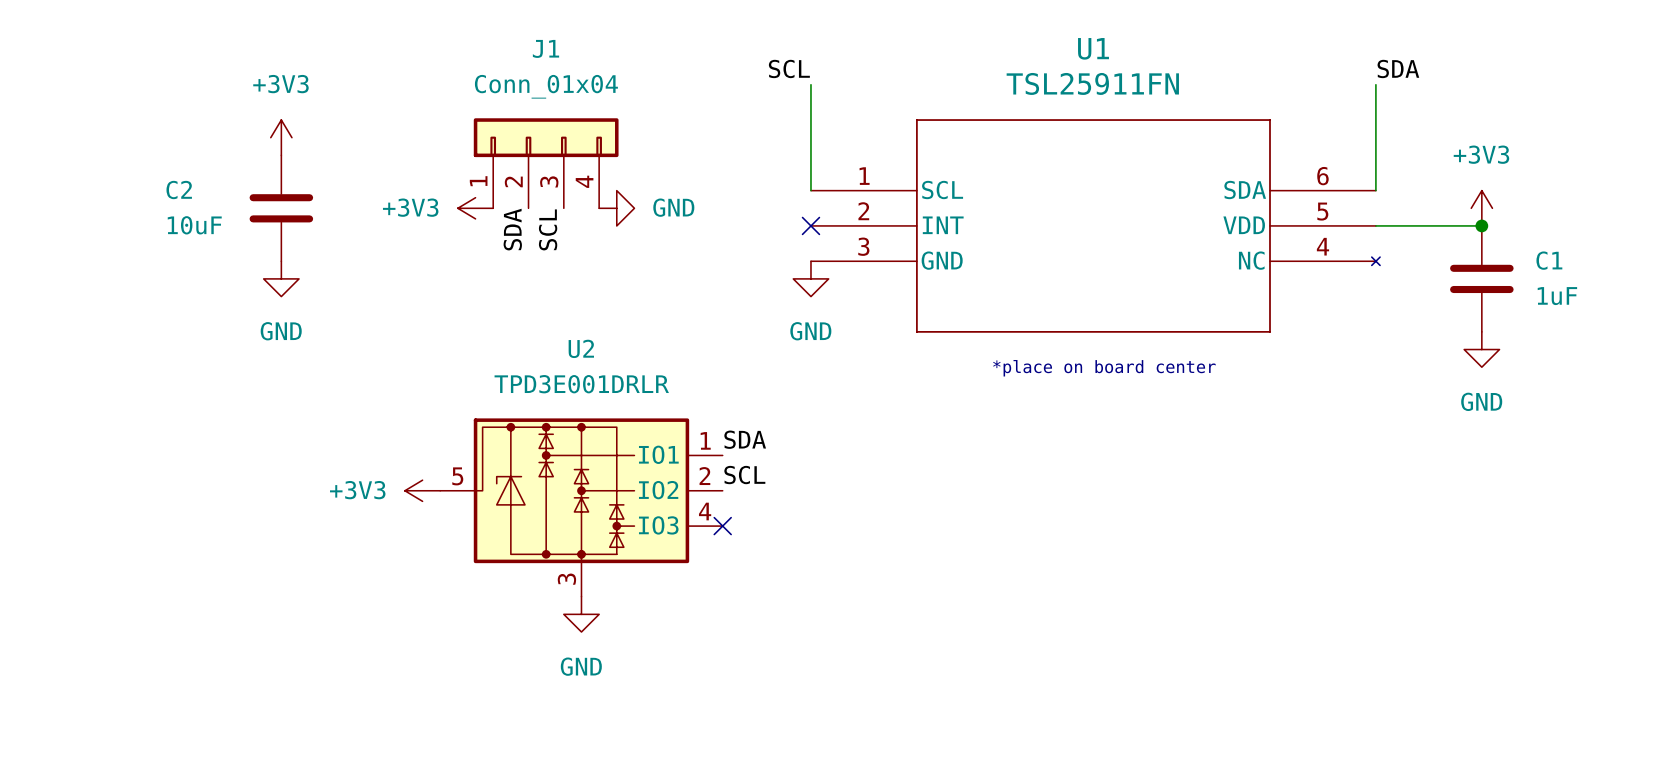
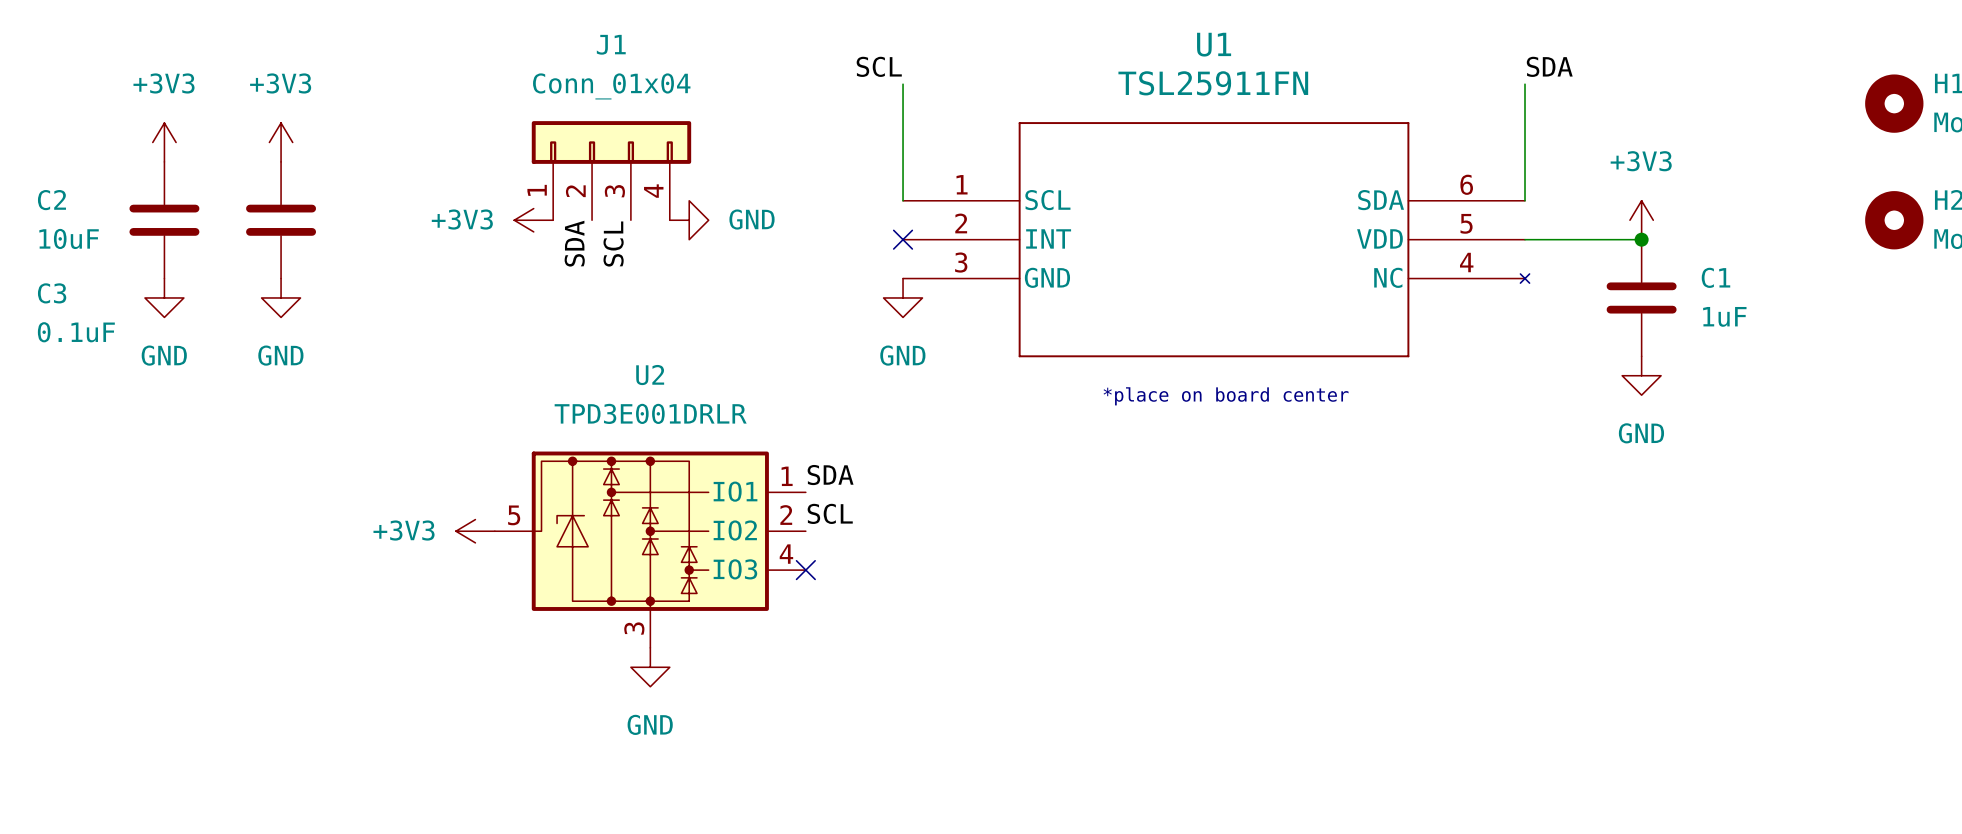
power symbol: none -> +3V3 (164, 142)
power symbol position: +3V3 (281, 137) -> +3V3 (281, 142)
C3: none -> 0.1uF (281, 220)
C2 position: (281, 208) -> (164, 220)
power symbol: none -> GND (164, 297)
power symbol position: GND (281, 278) -> GND (281, 297)

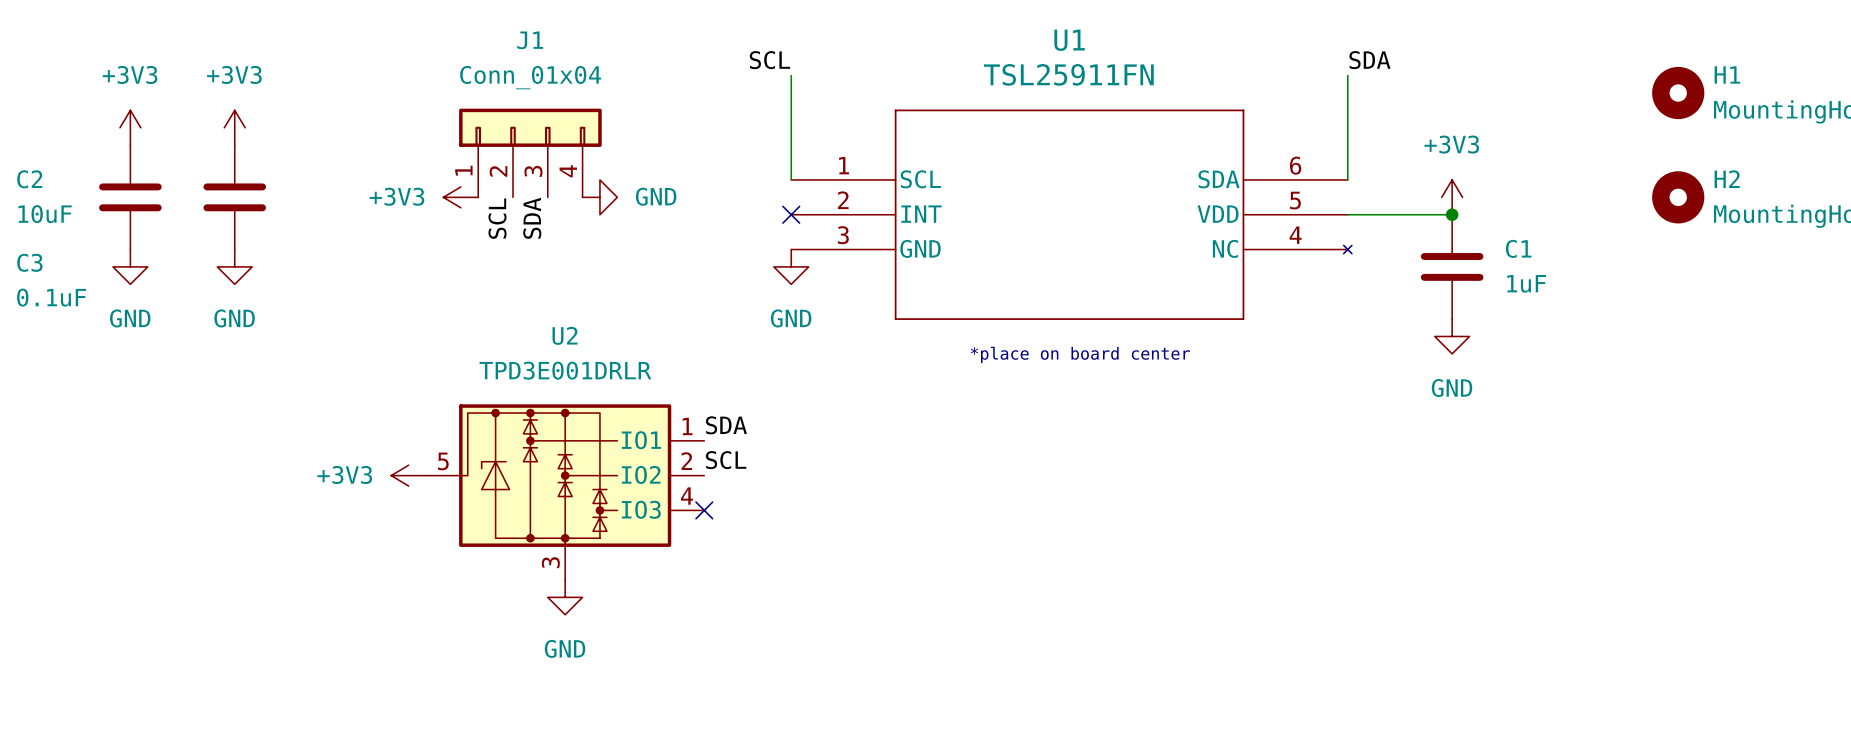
label: SDA (574, 243) -> SCL (497, 218)
label: SCL (613, 244) -> SDA (532, 218)

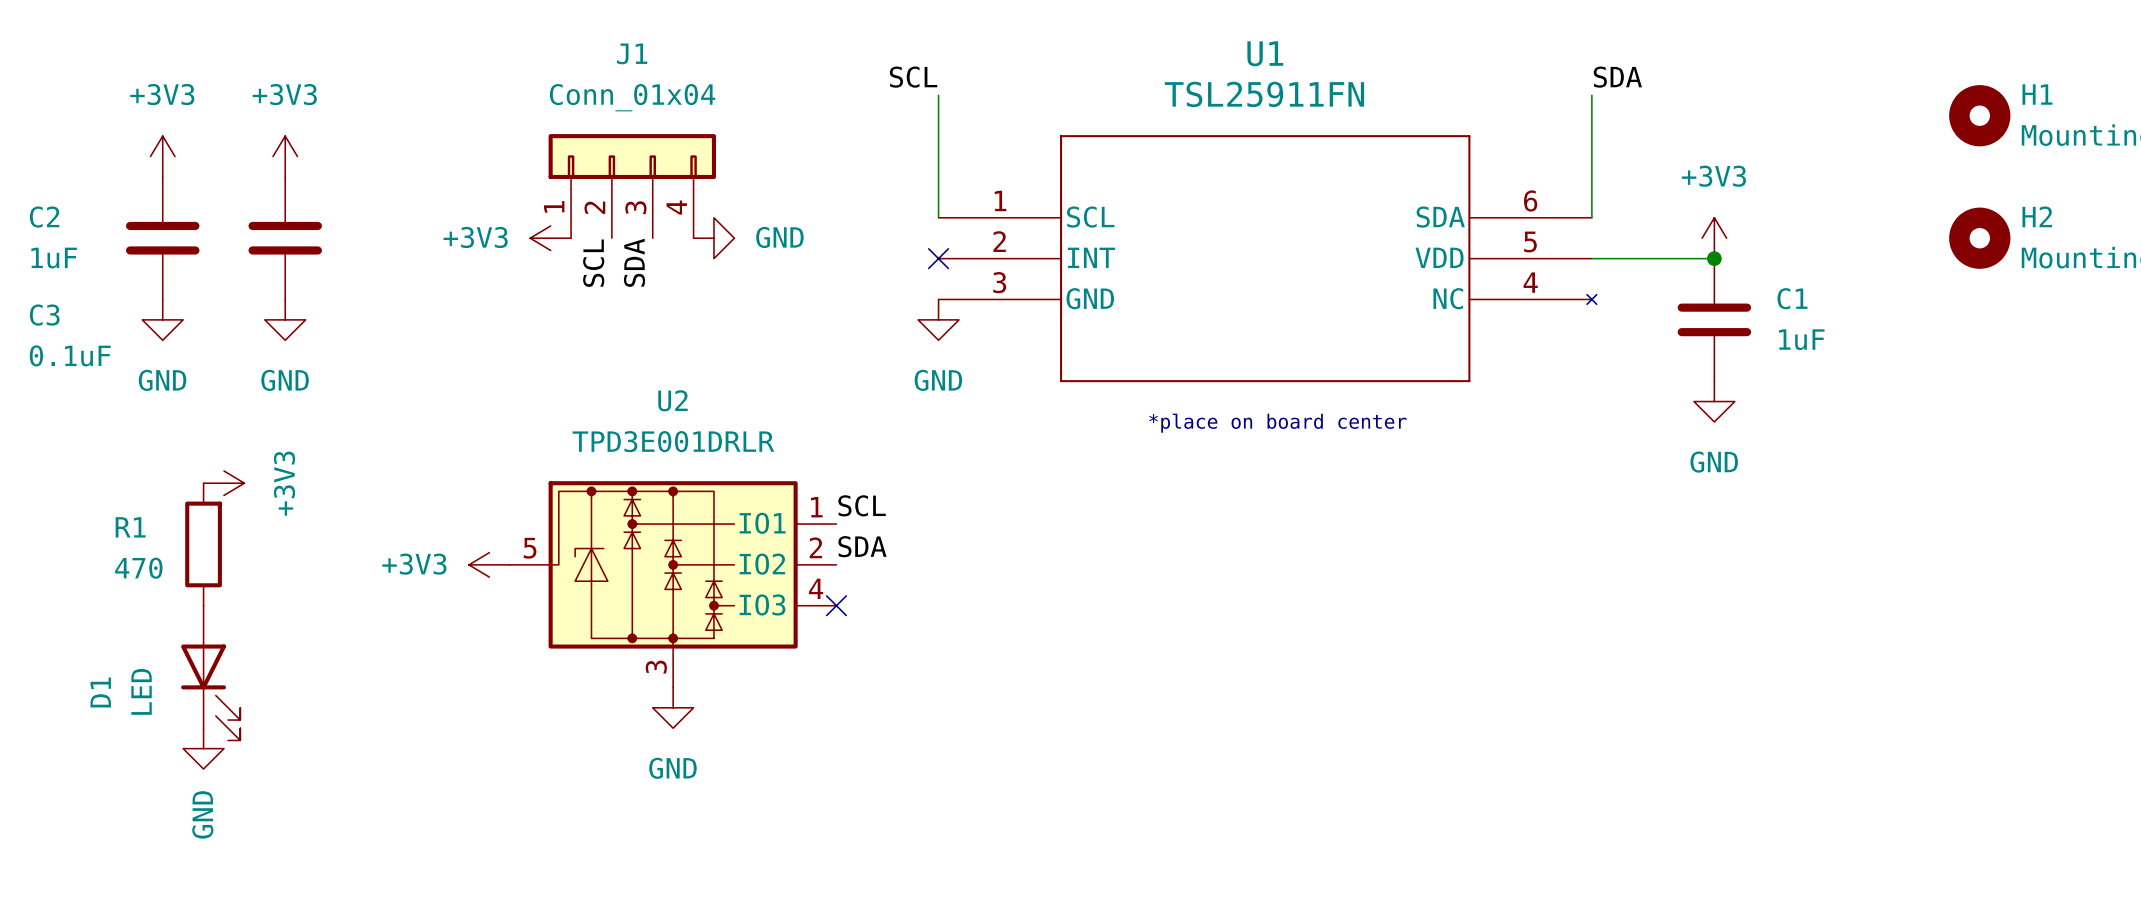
C2 value: 10uF (45, 214) -> 1uF (54, 258)
power symbol: none -> +3V3 (223, 483)
label: SDA (726, 425) -> SCL (862, 505)
R1: none -> 470 (203, 544)
label: SCL (726, 460) -> SDA (862, 546)
D1: none -> LED (210, 673)
power symbol: none -> GND (203, 748)

